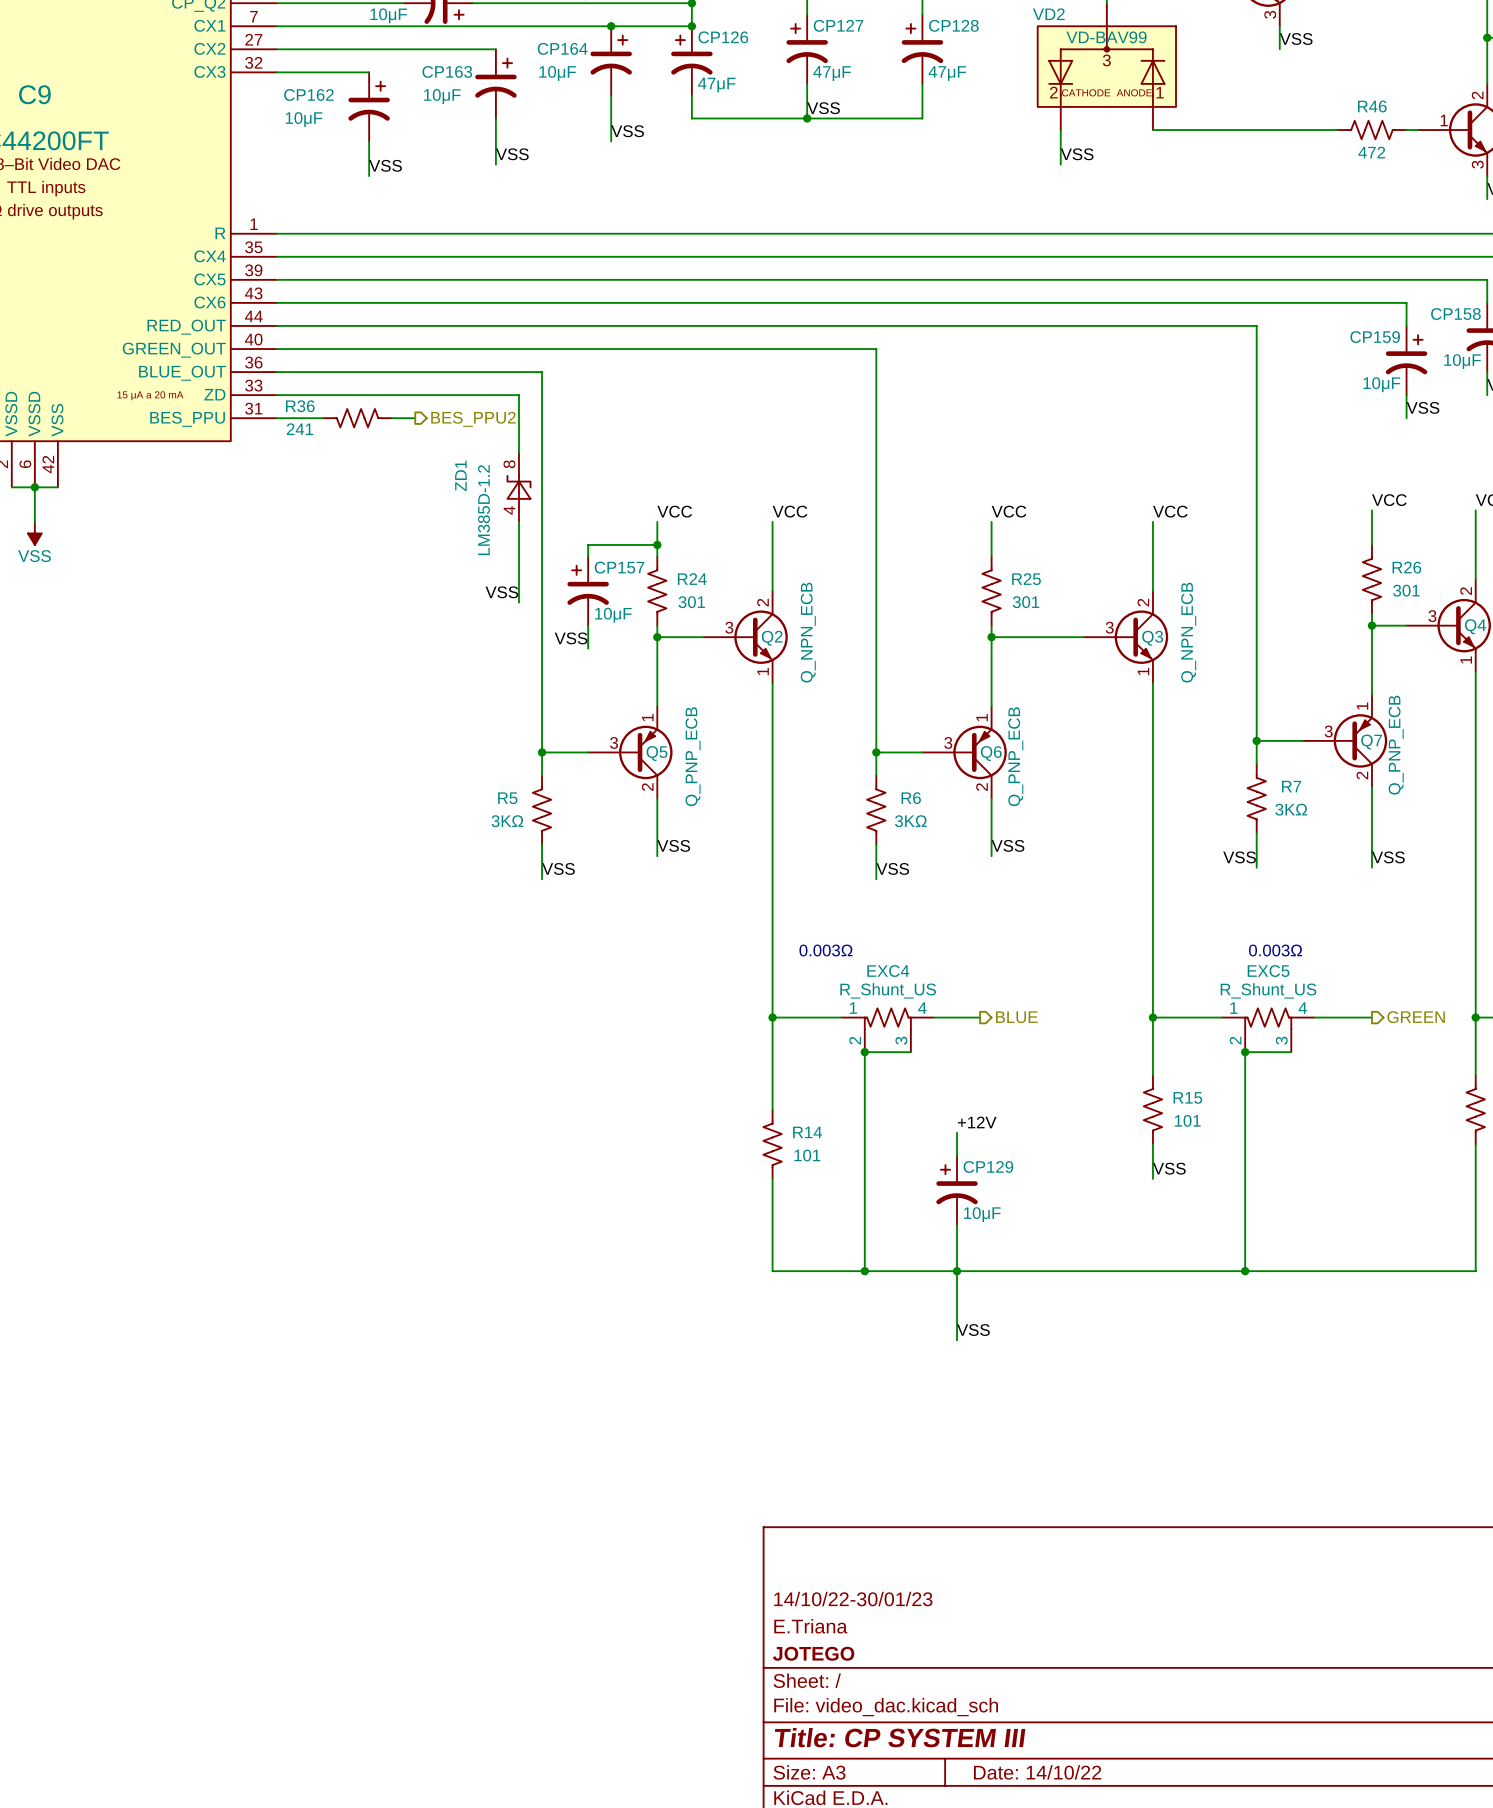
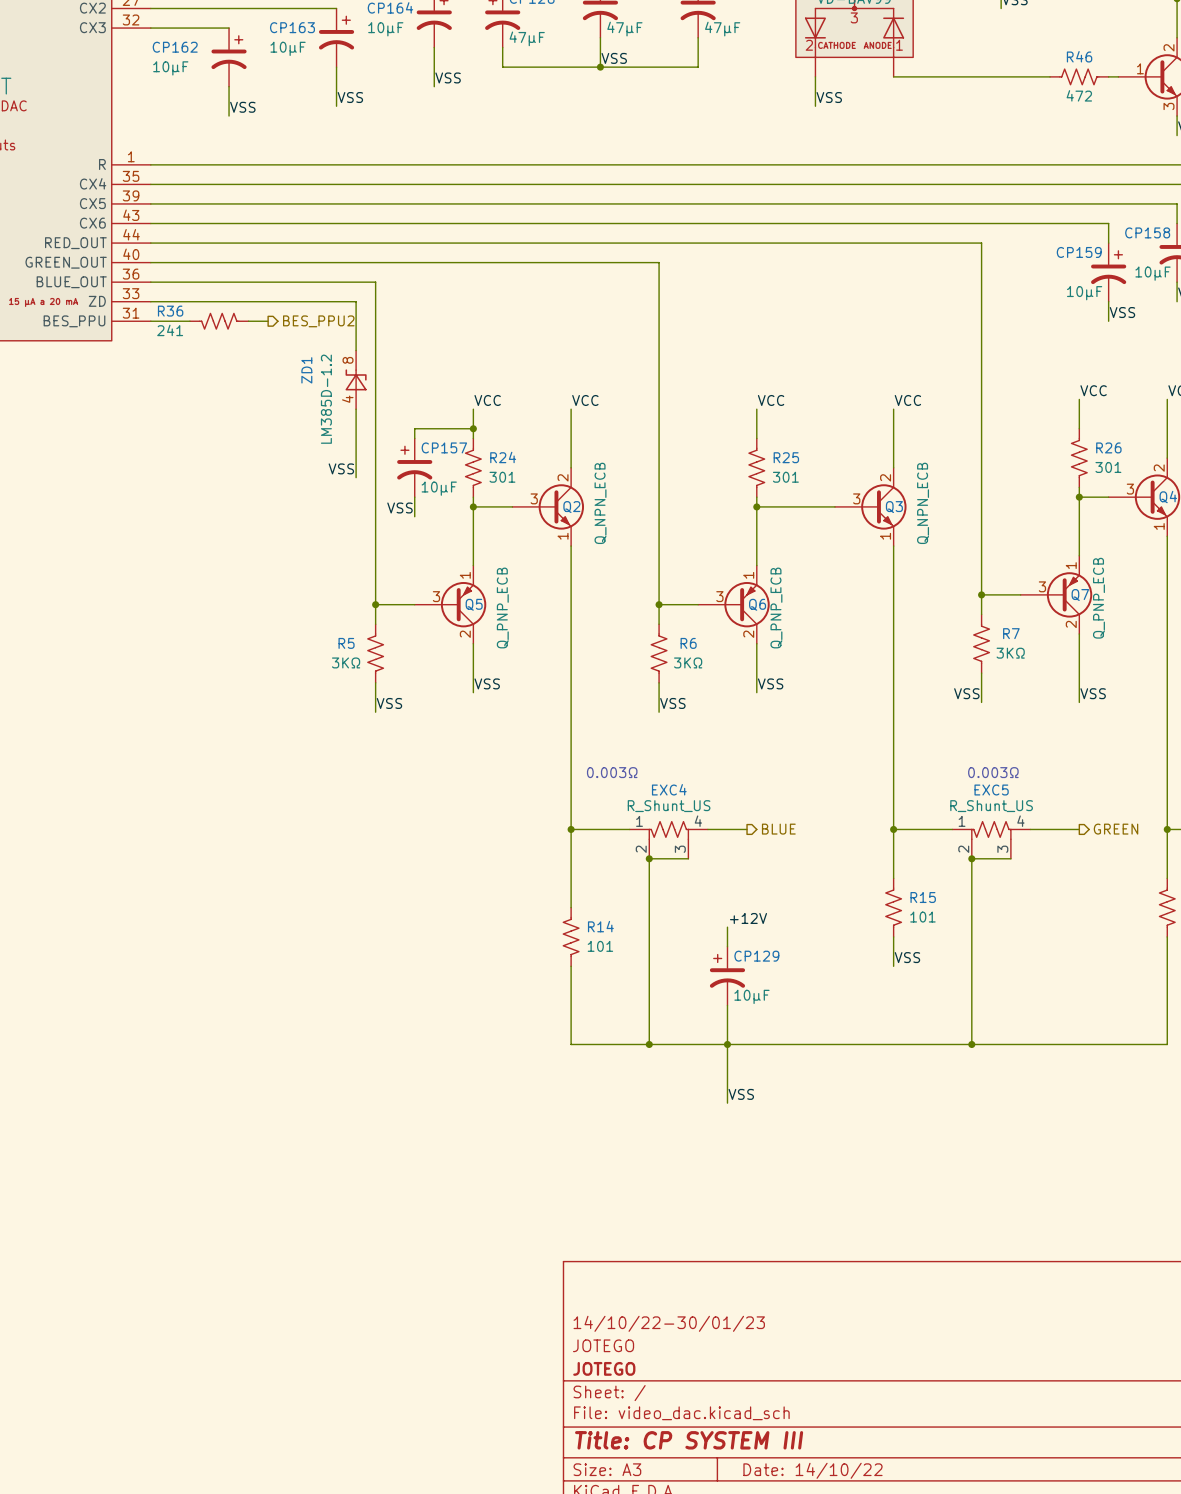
title block: E.Triana (810, 1626) -> JOTEGO (603, 1345)

